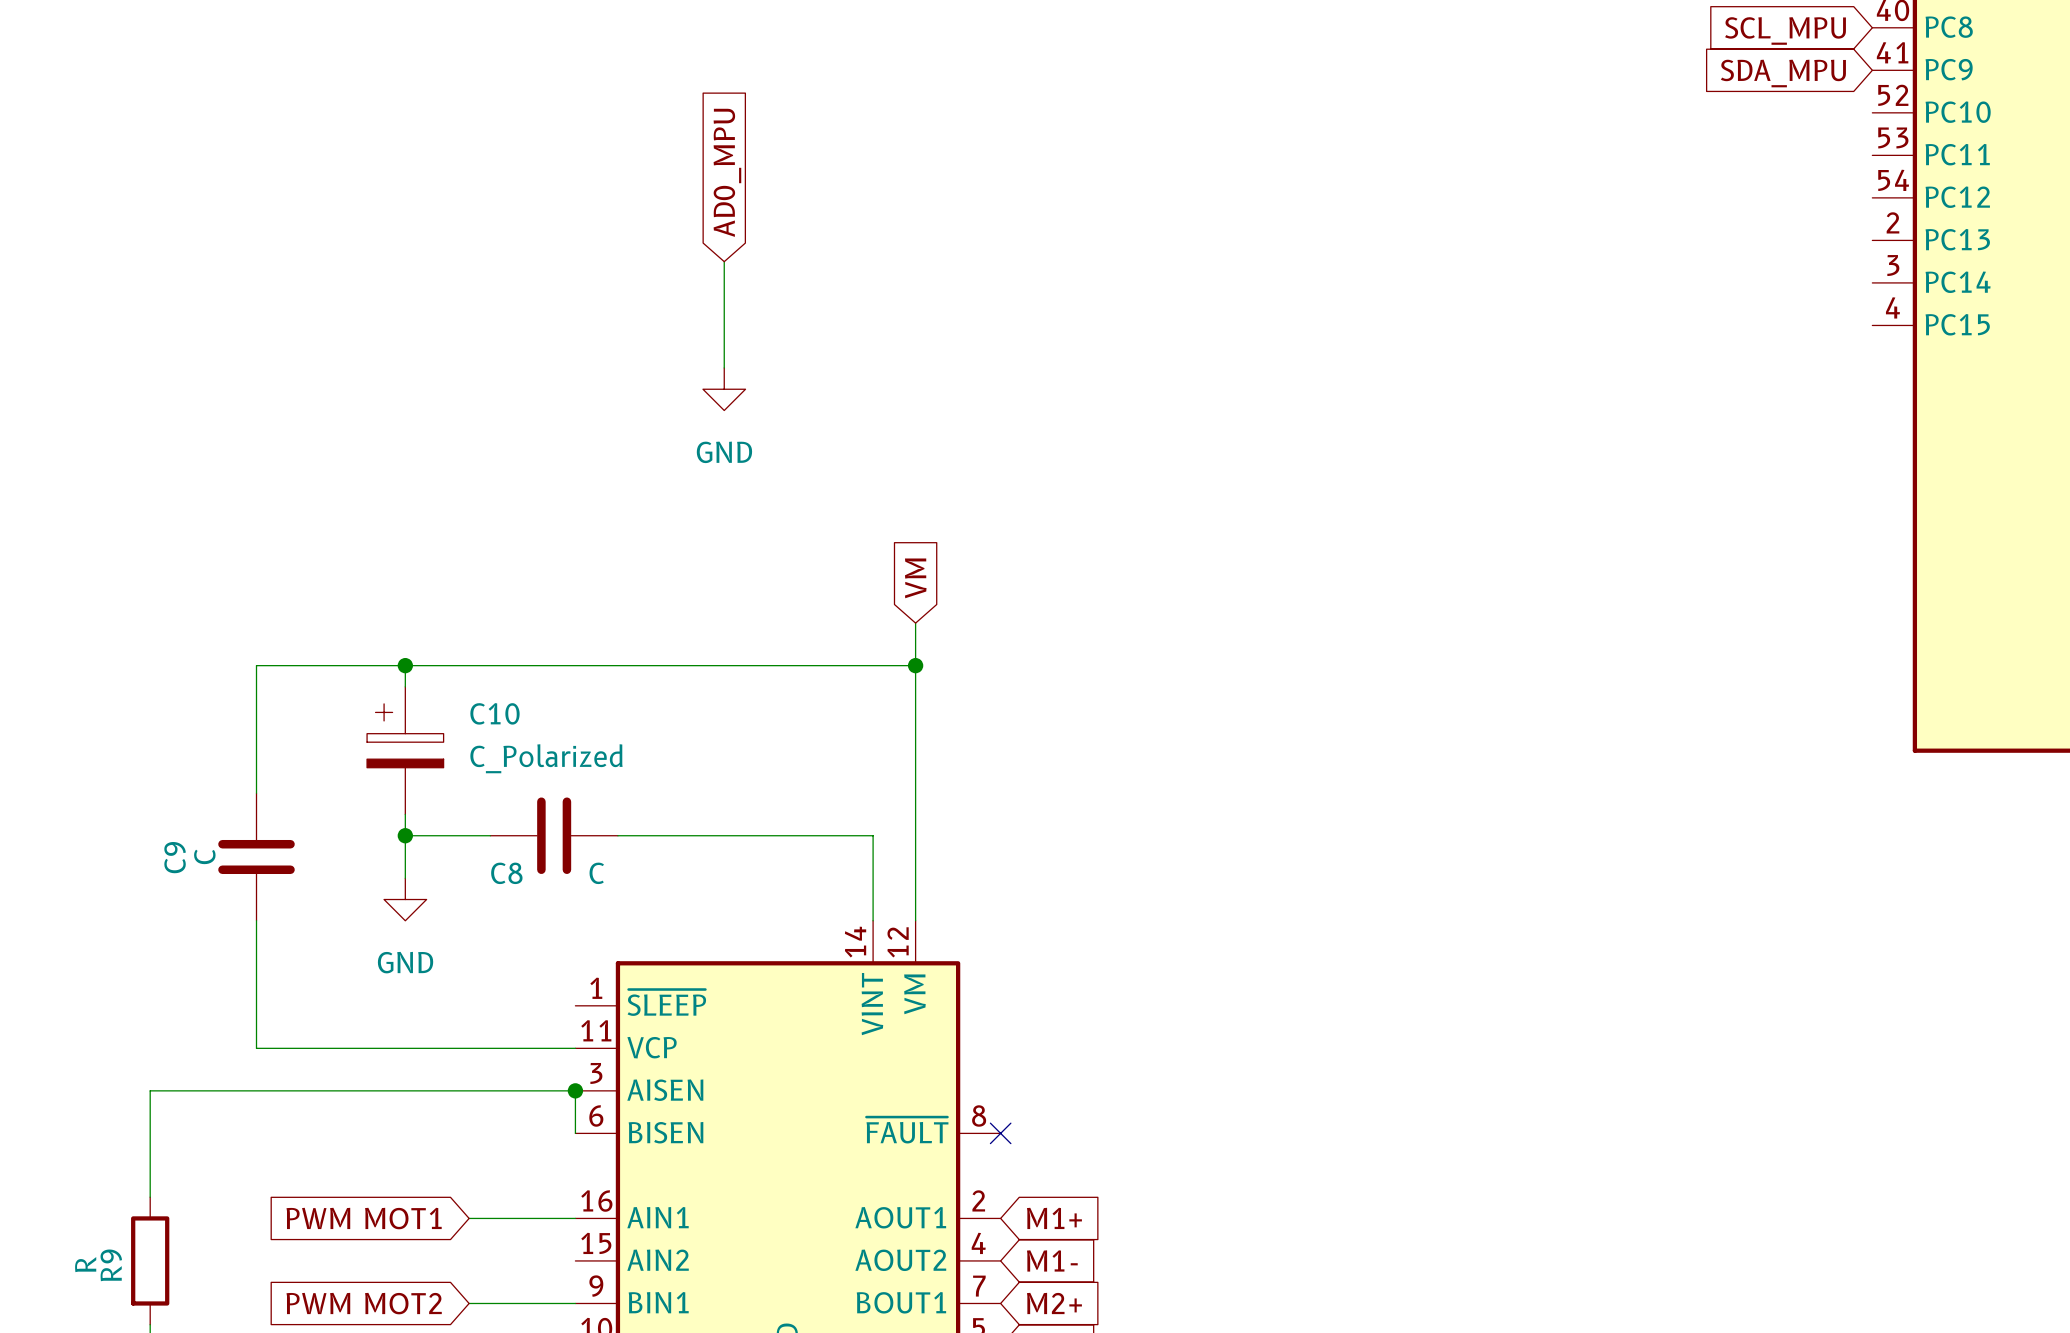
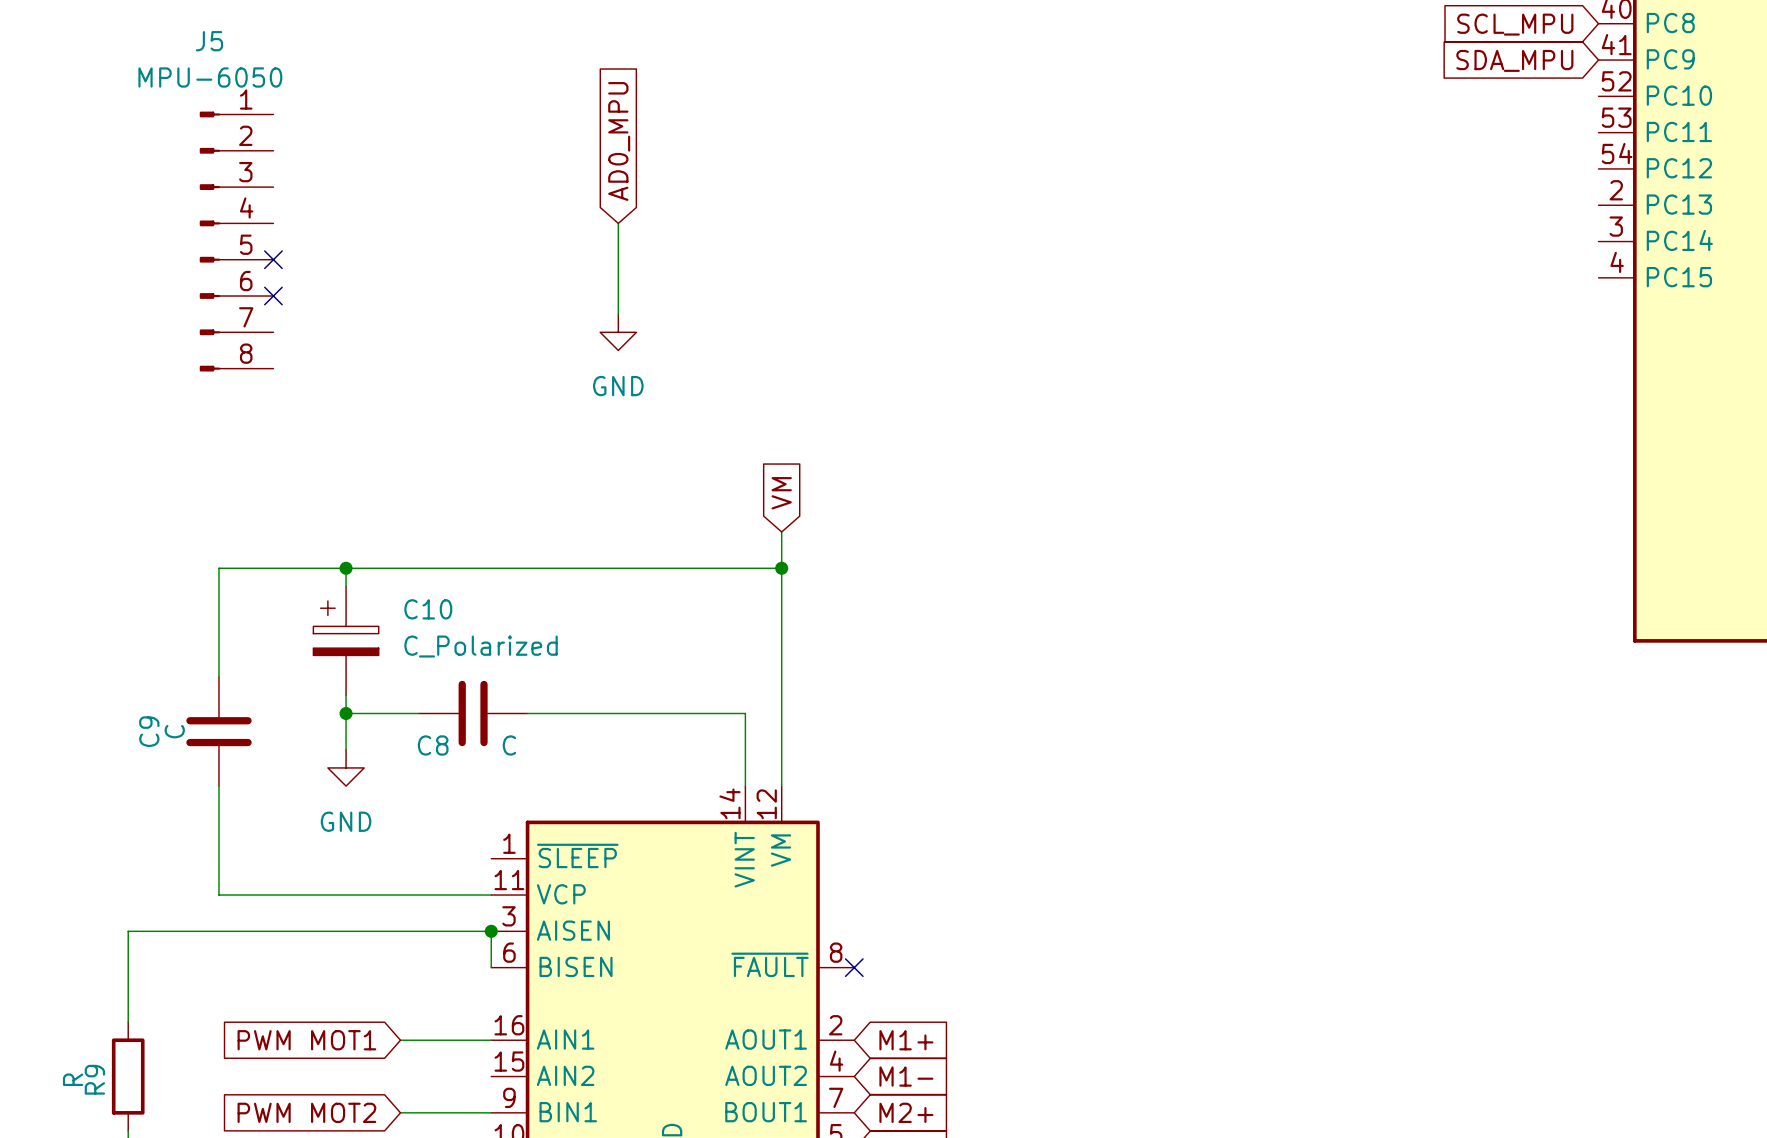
J5: none -> MPU-6050 (236, 241)
no-connect mark: none -> (273, 259)
no-connect mark: none -> (273, 296)

